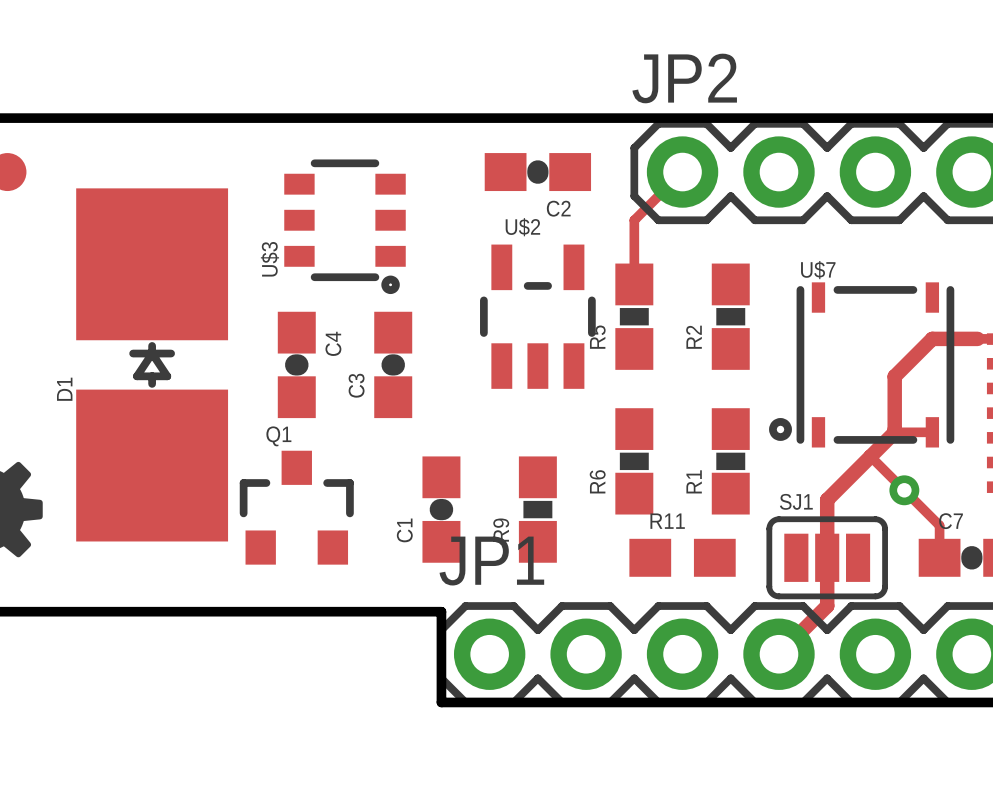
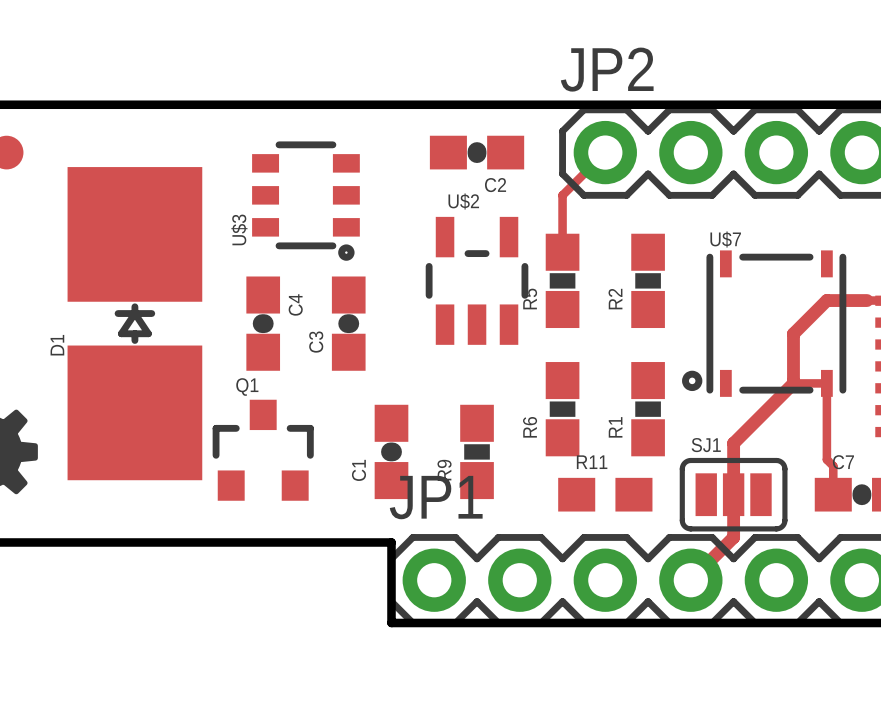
track: (870, 456) (932, 518) -> (826, 383) (826, 459)
via: (904, 490) -> none

